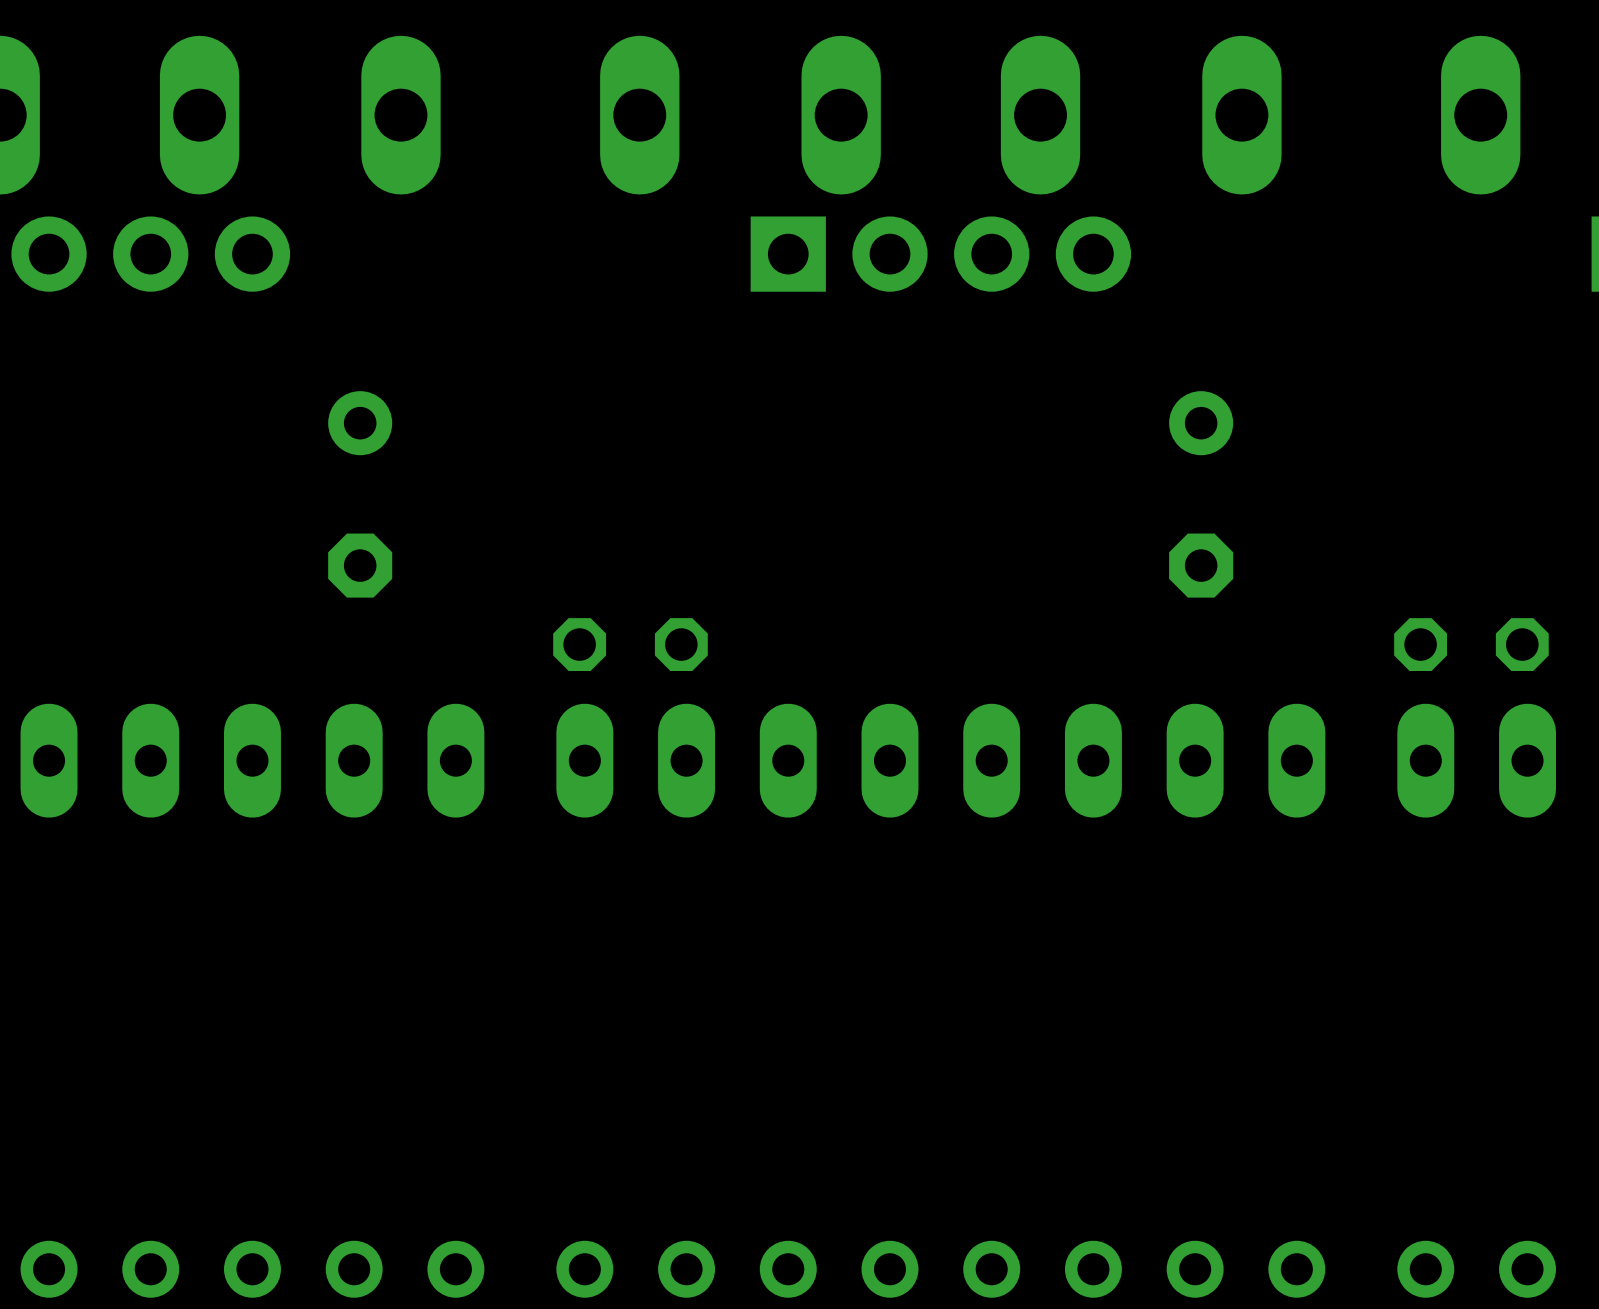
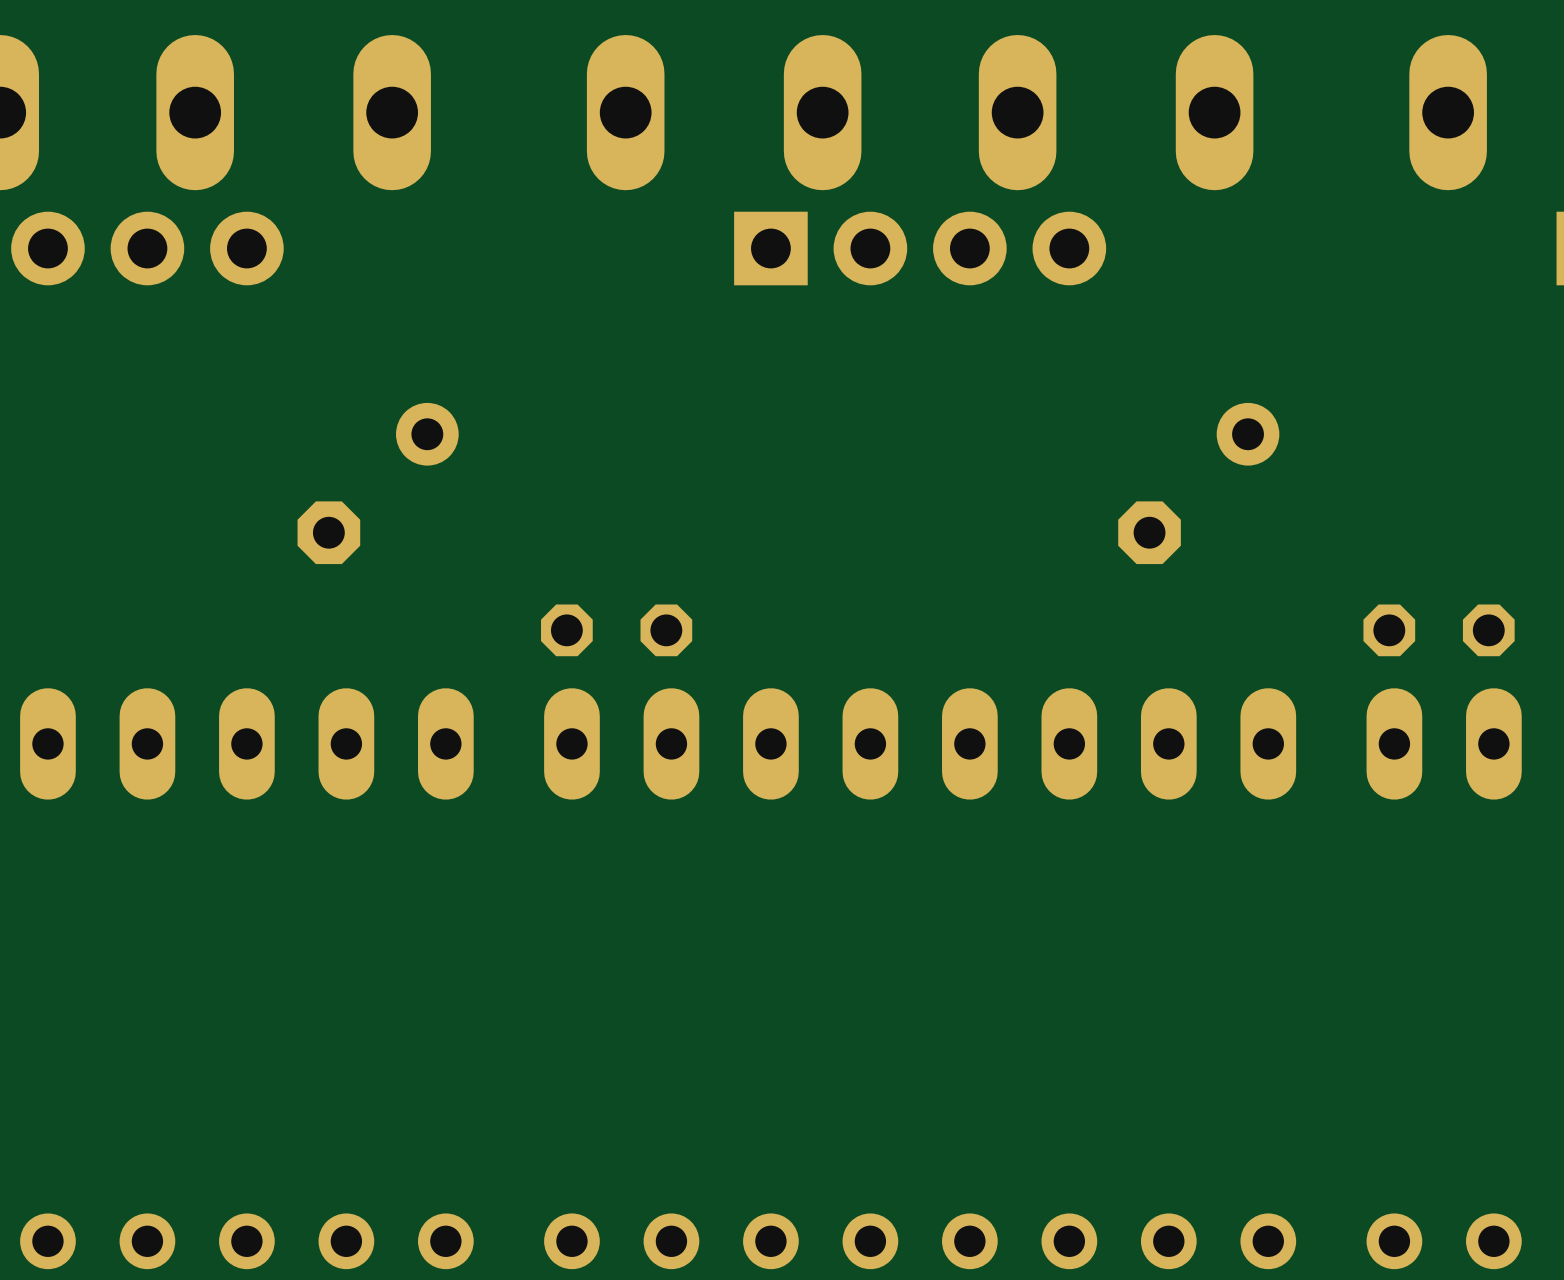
part rotation: 0° (360, 494) -> 45° clockwise (378, 483)
part rotation: 0° (1201, 494) -> 45° clockwise (1198, 483)

